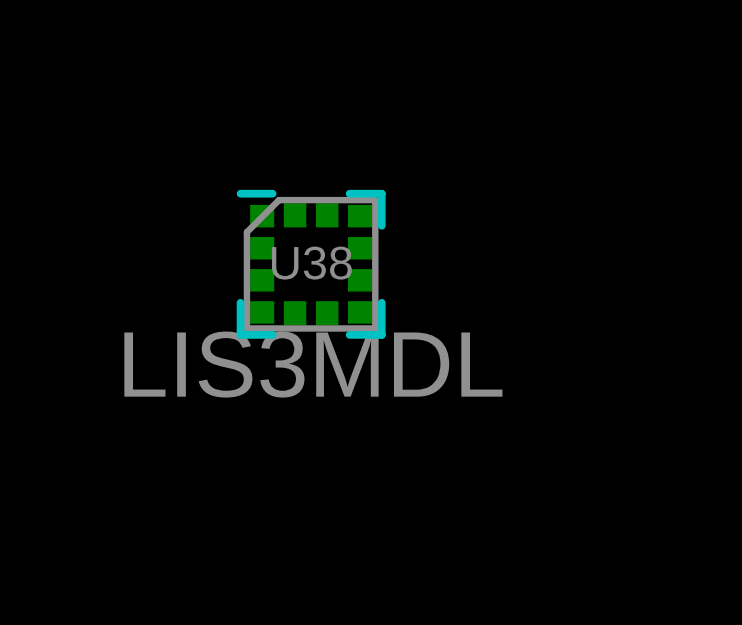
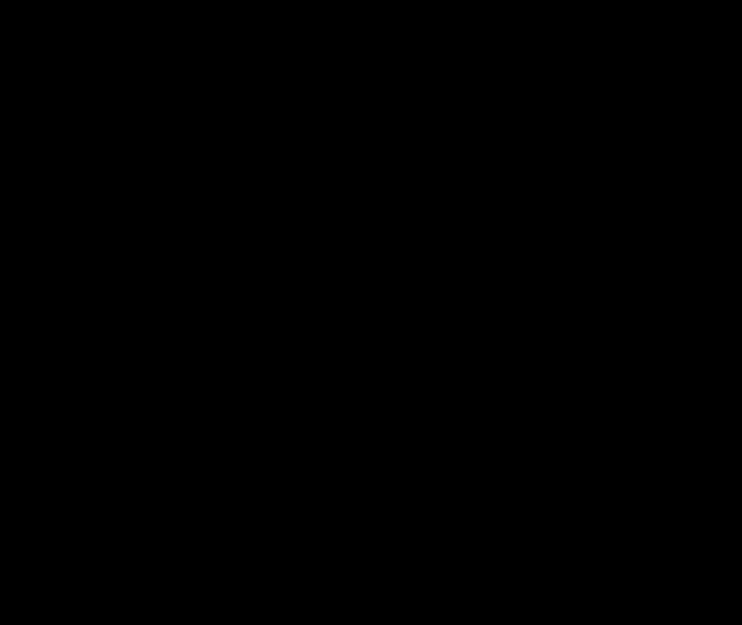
U38: LIS3MDL (311, 264) -> none

